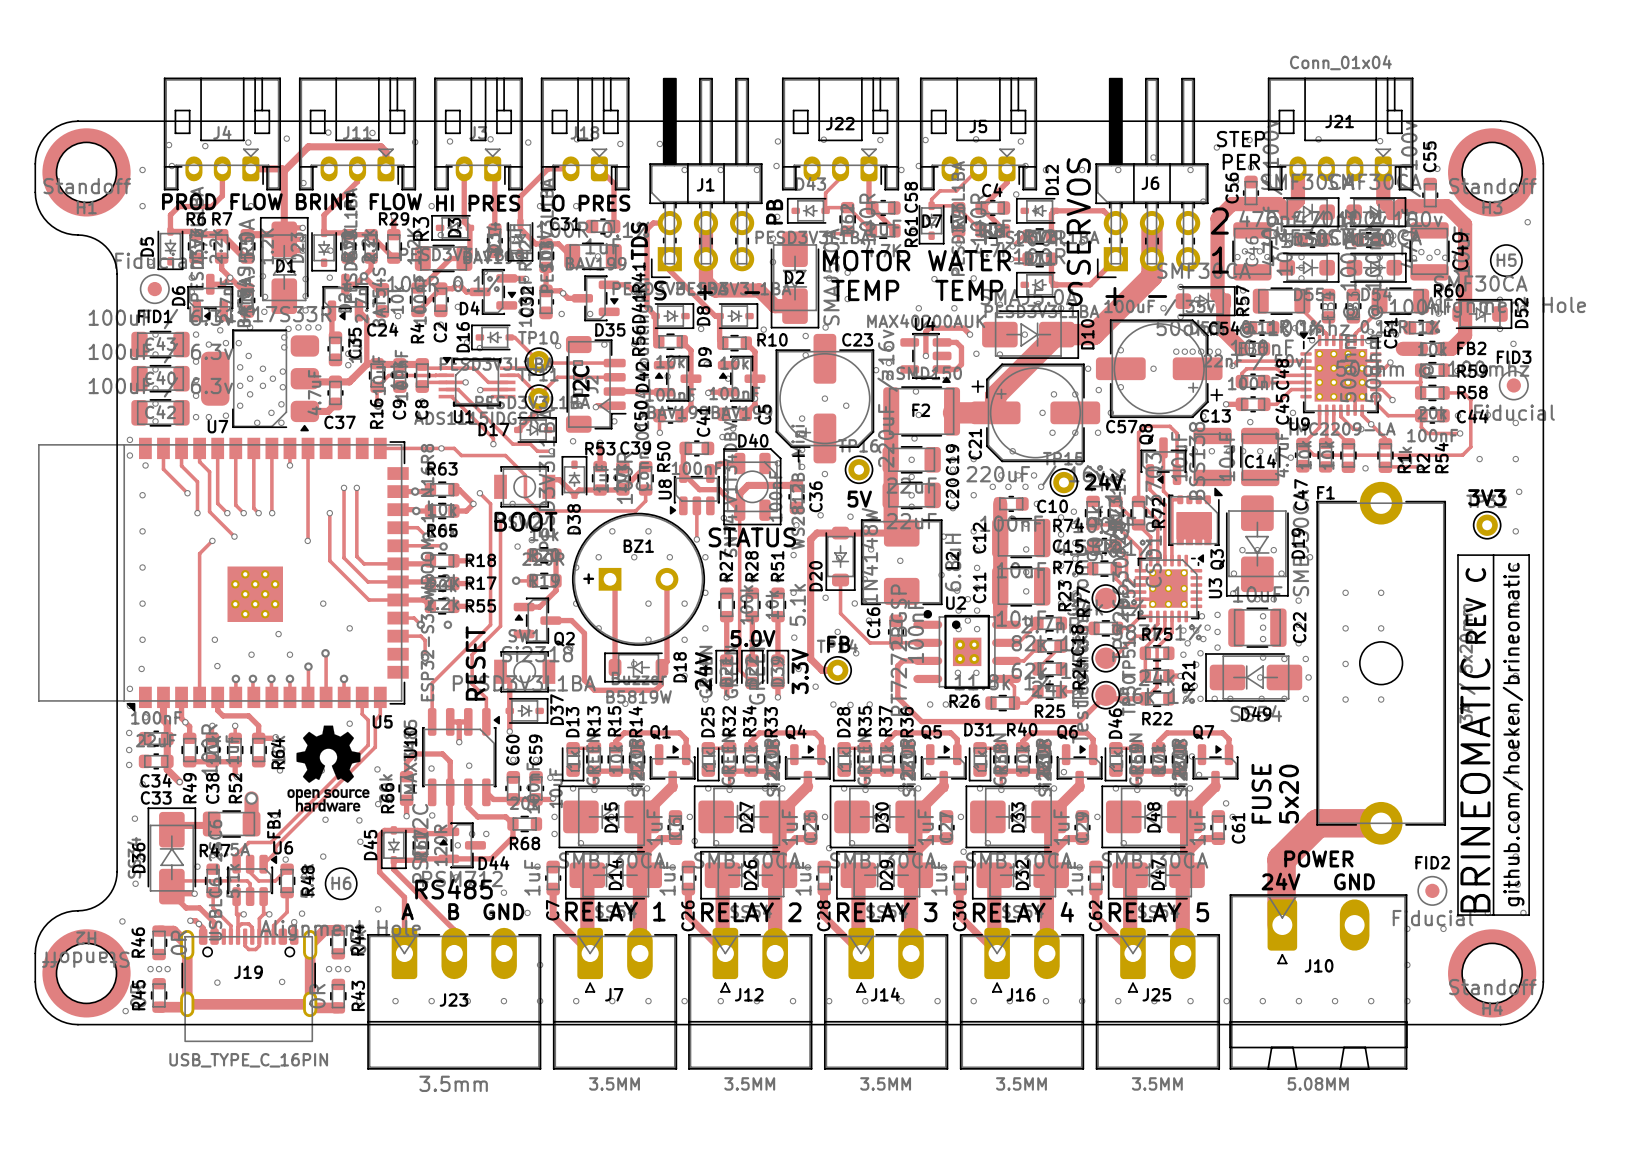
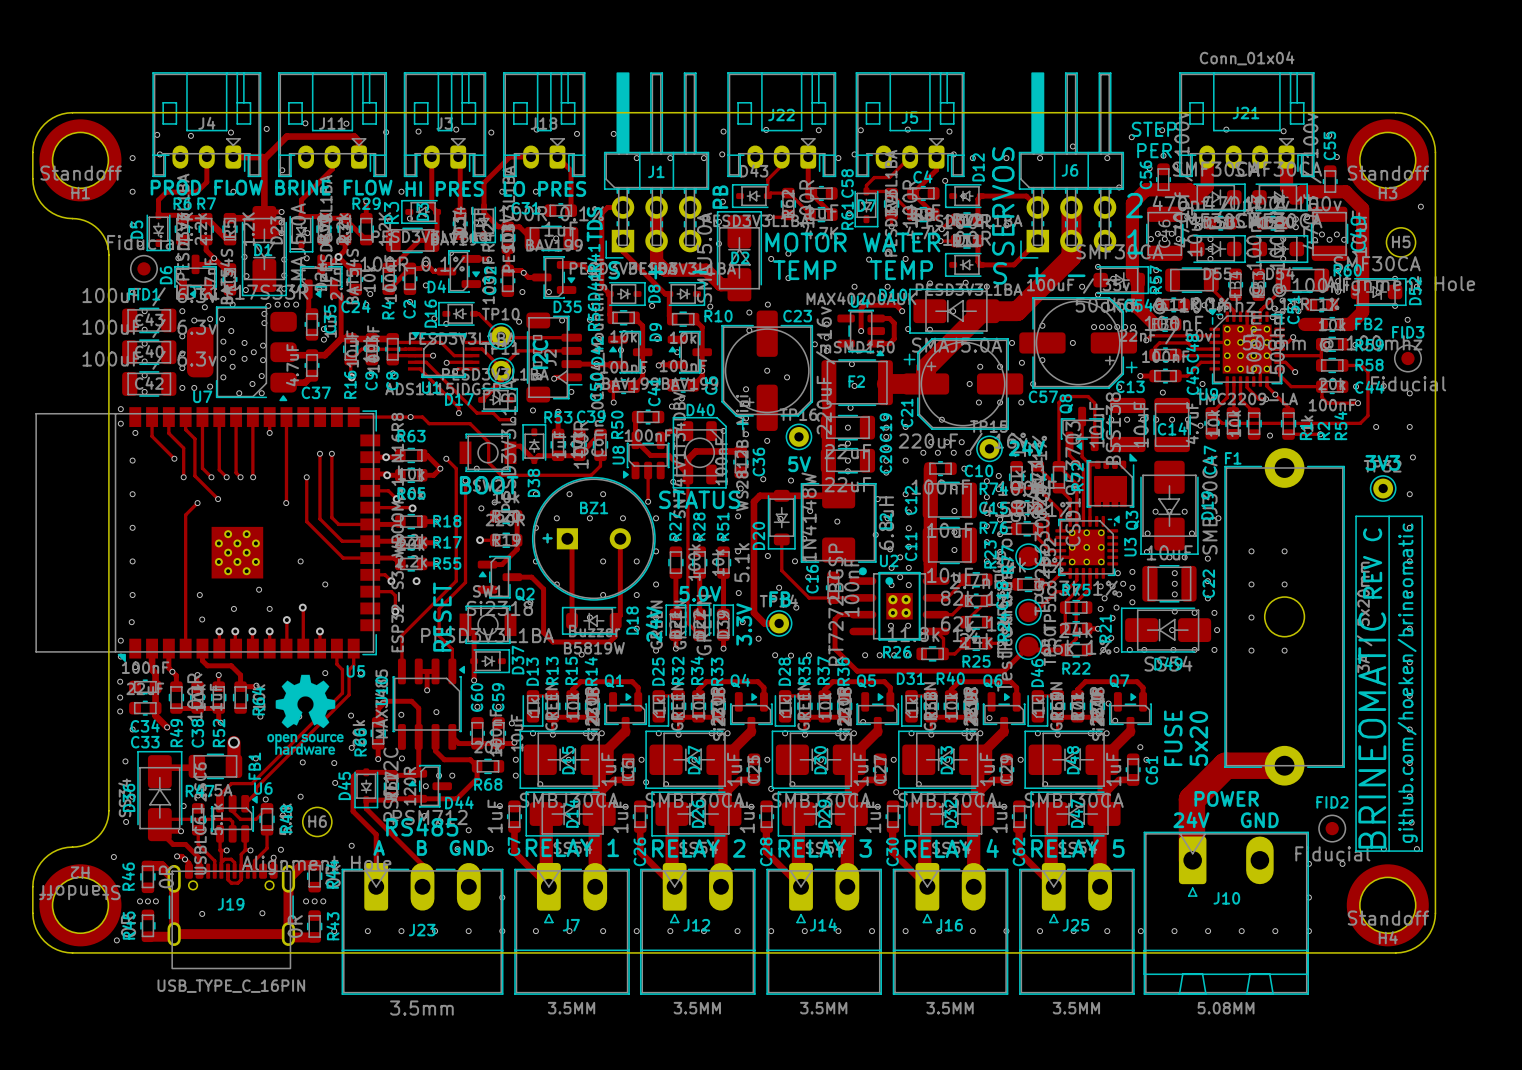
D1 rotation: 0° (284, 265) -> 180° (264, 251)
D2 rotation: 0° (795, 279) -> 180° (739, 256)
D10 rotation: 0° (1030, 334) -> 180° (954, 311)

